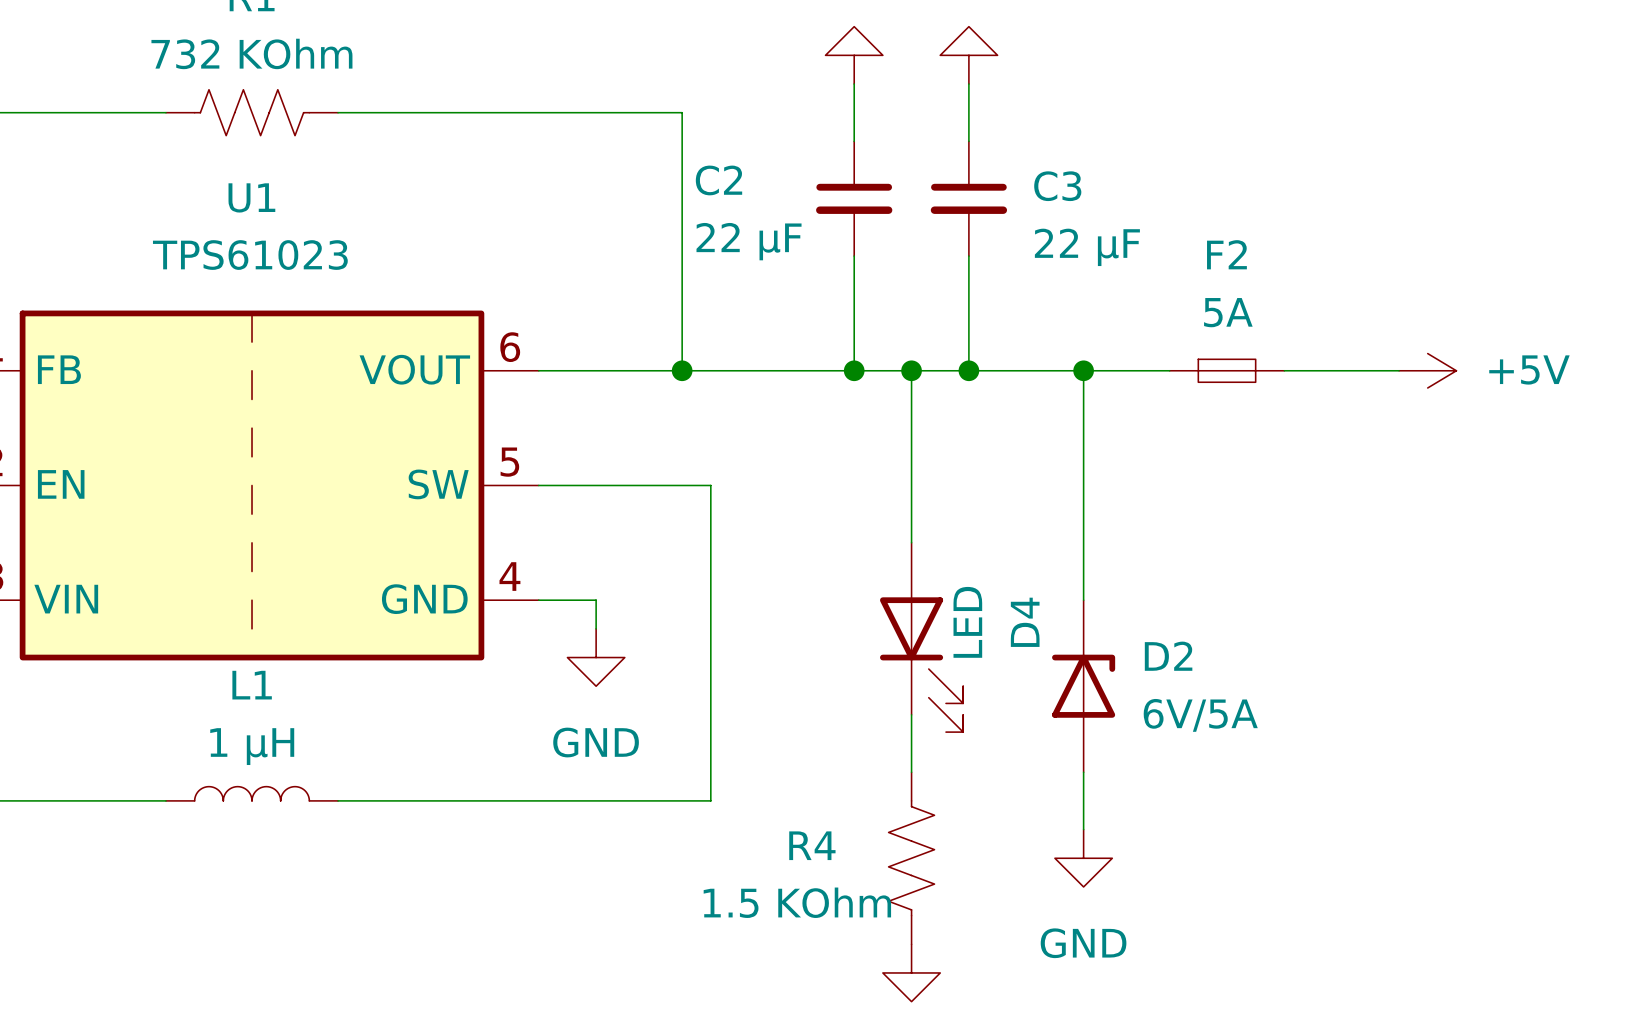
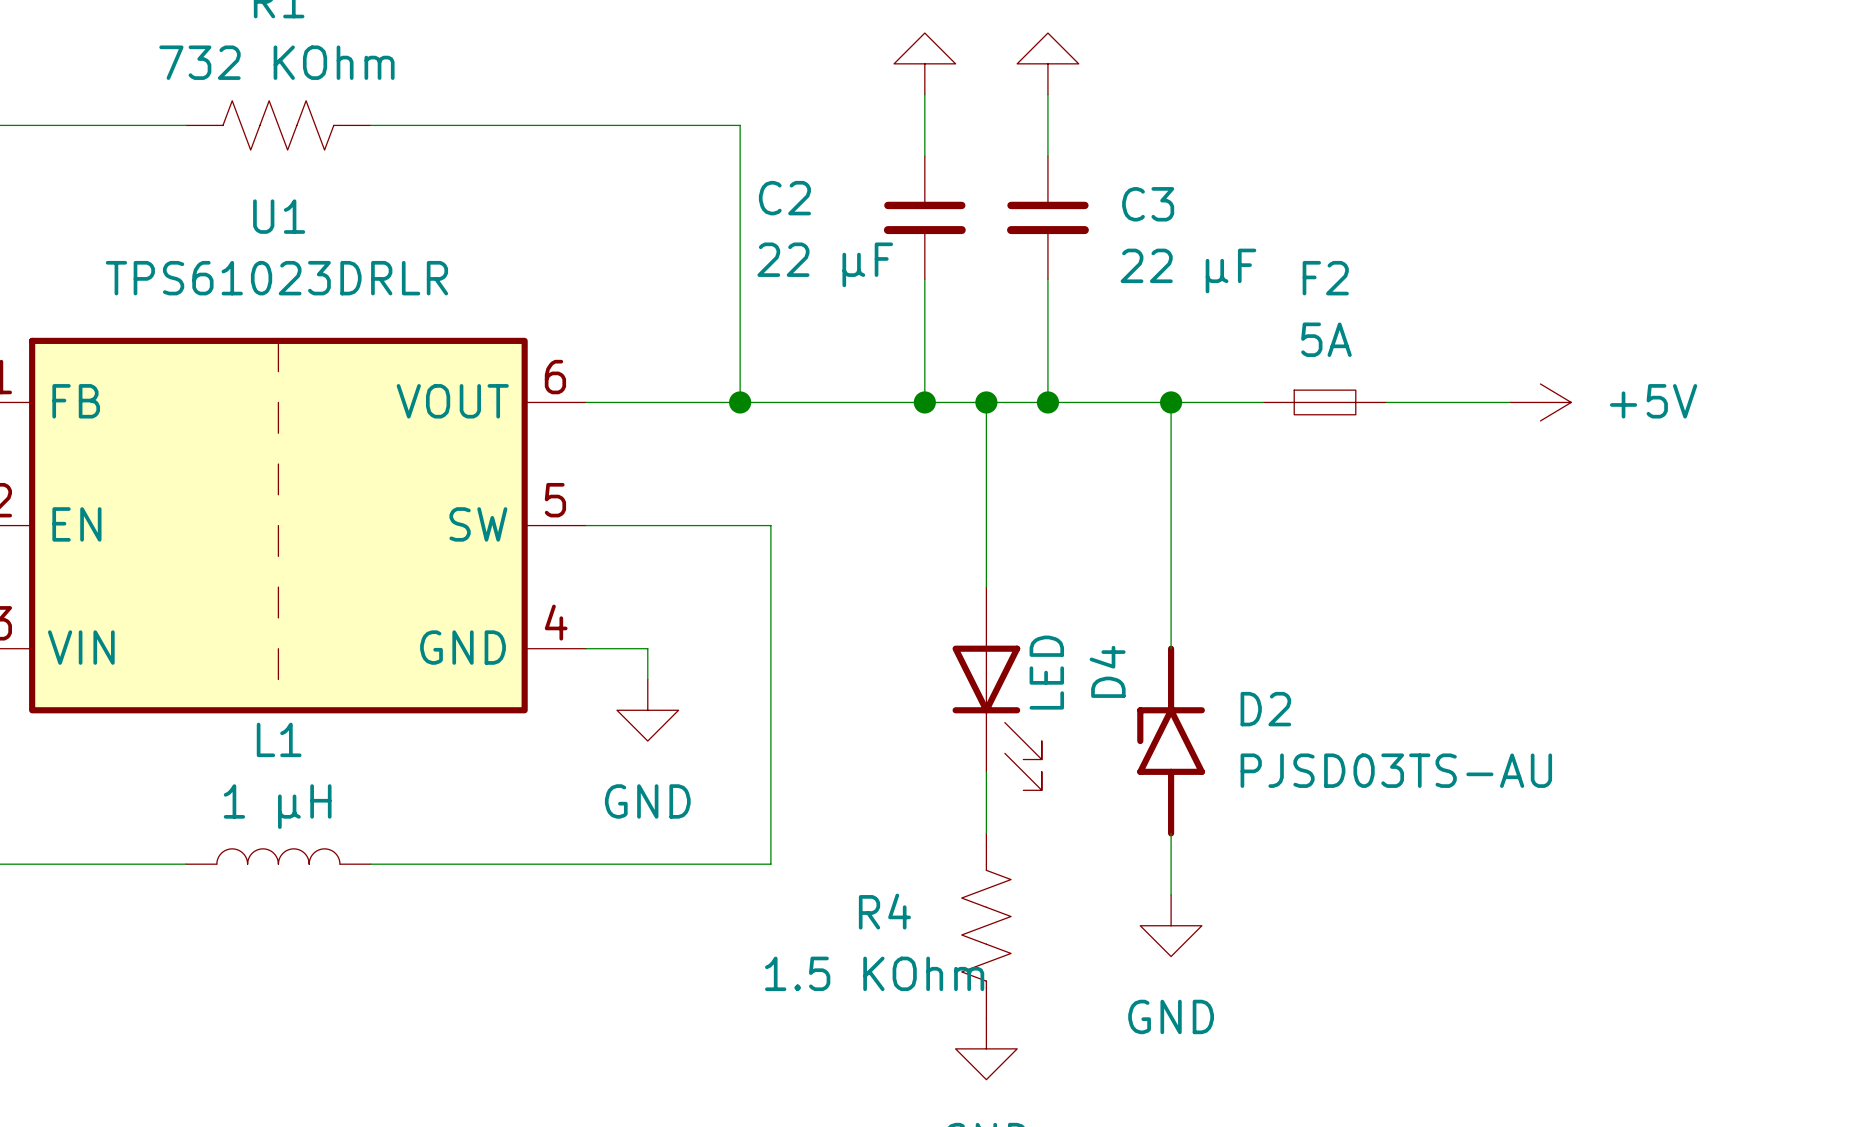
U1 value: TPS61023 (250, 255) -> TPS61023DRLR (276, 278)
D2 symbol: [1052, 600, 1116, 773] -> [1137, 645, 1205, 837]
D2 value: 6V/5A (1200, 715) -> PJSD03TS-AU (1396, 770)

